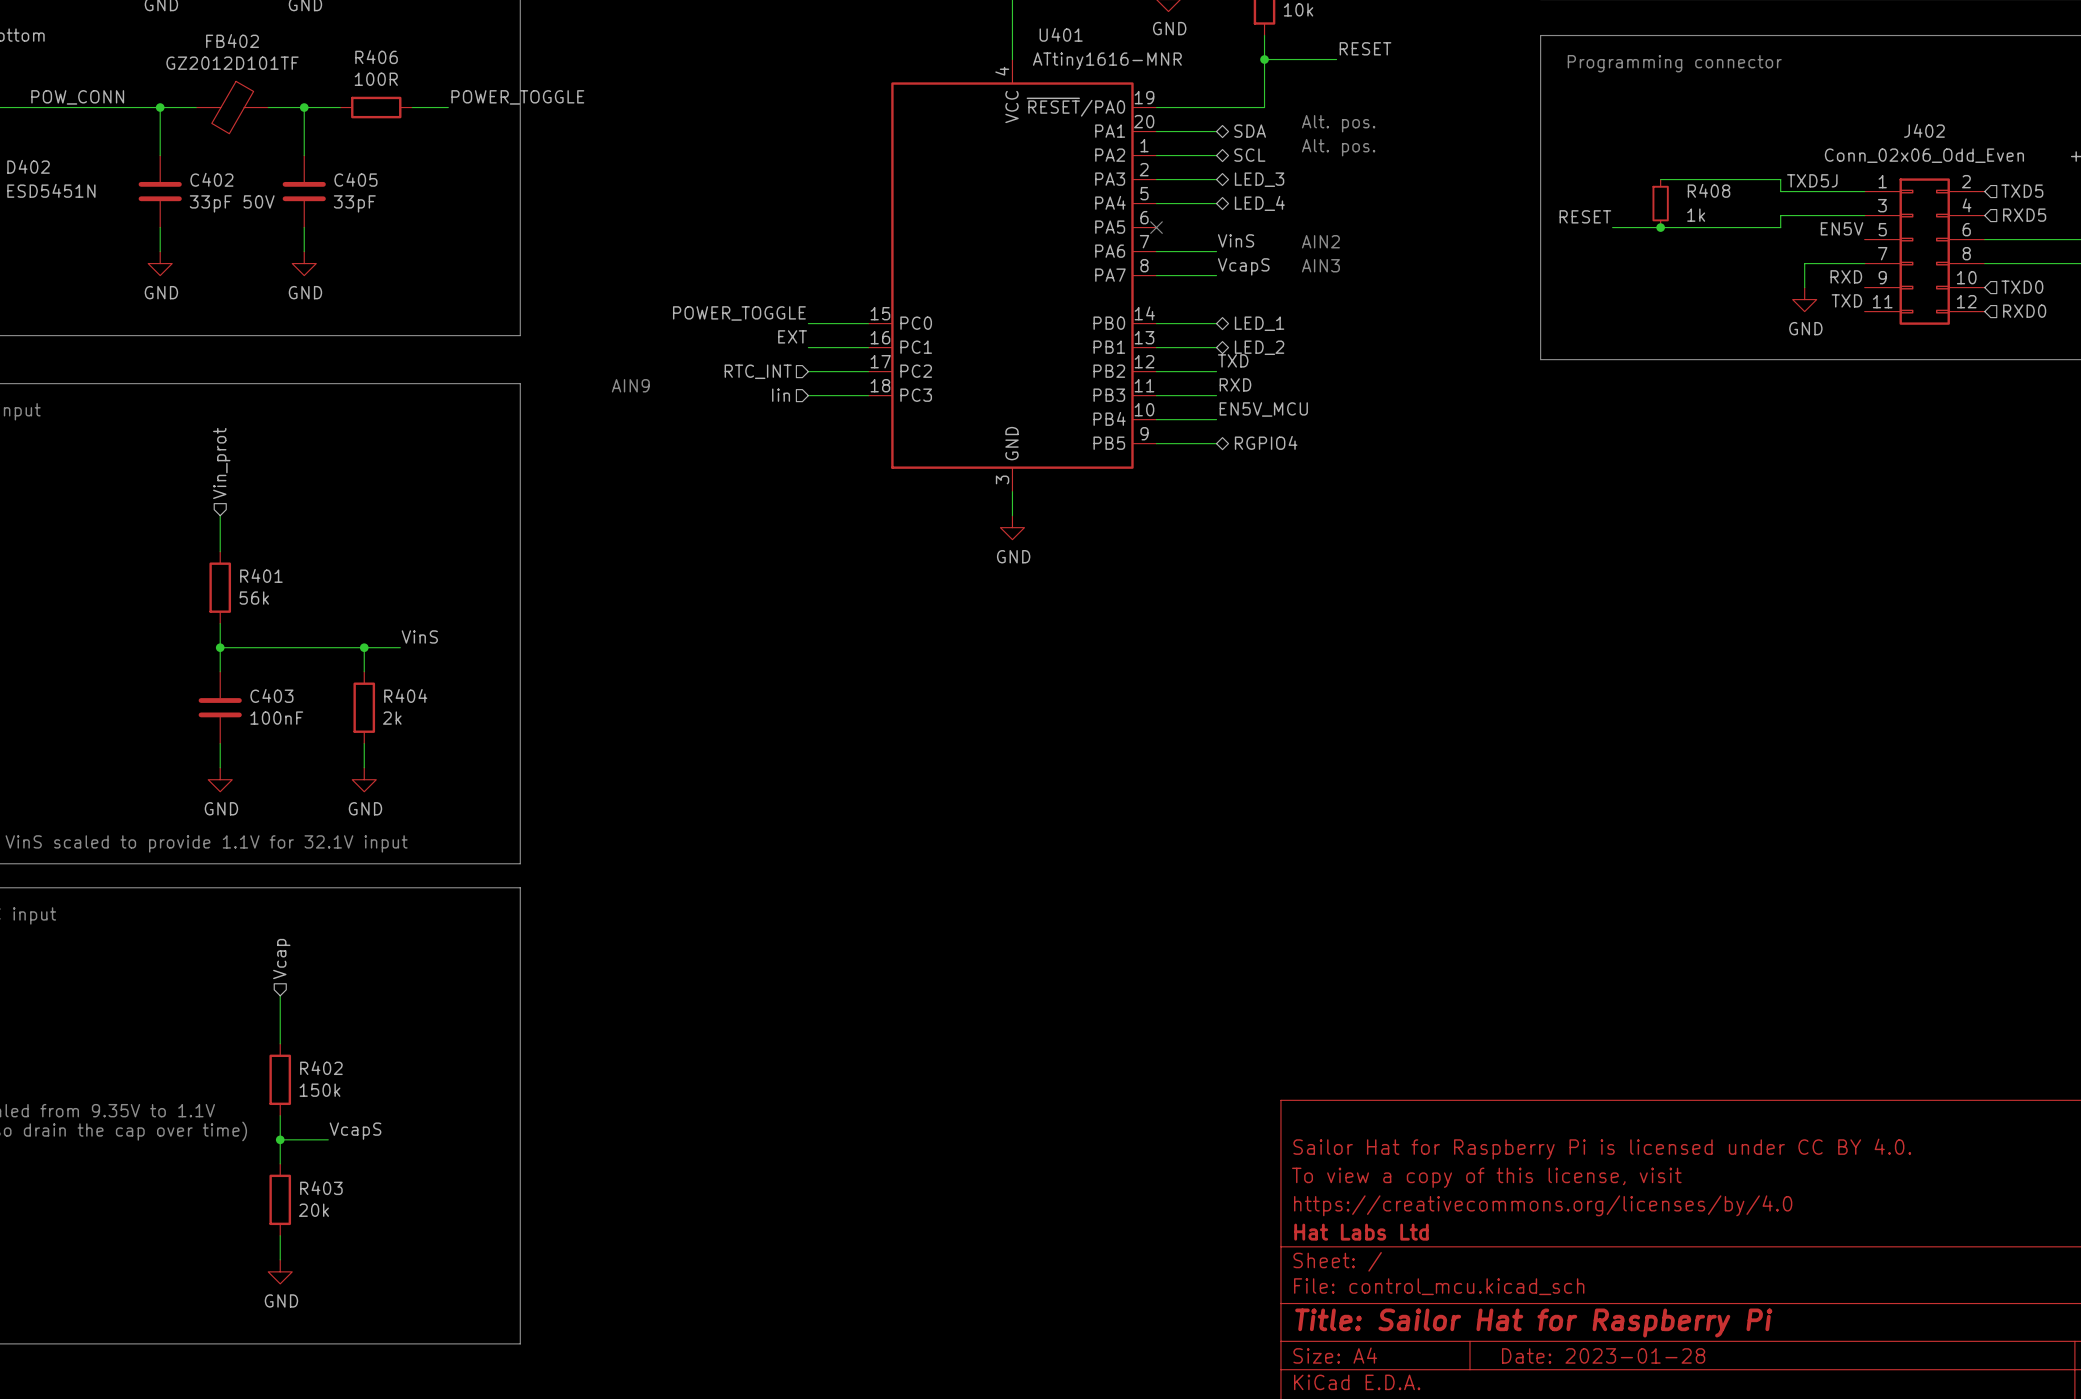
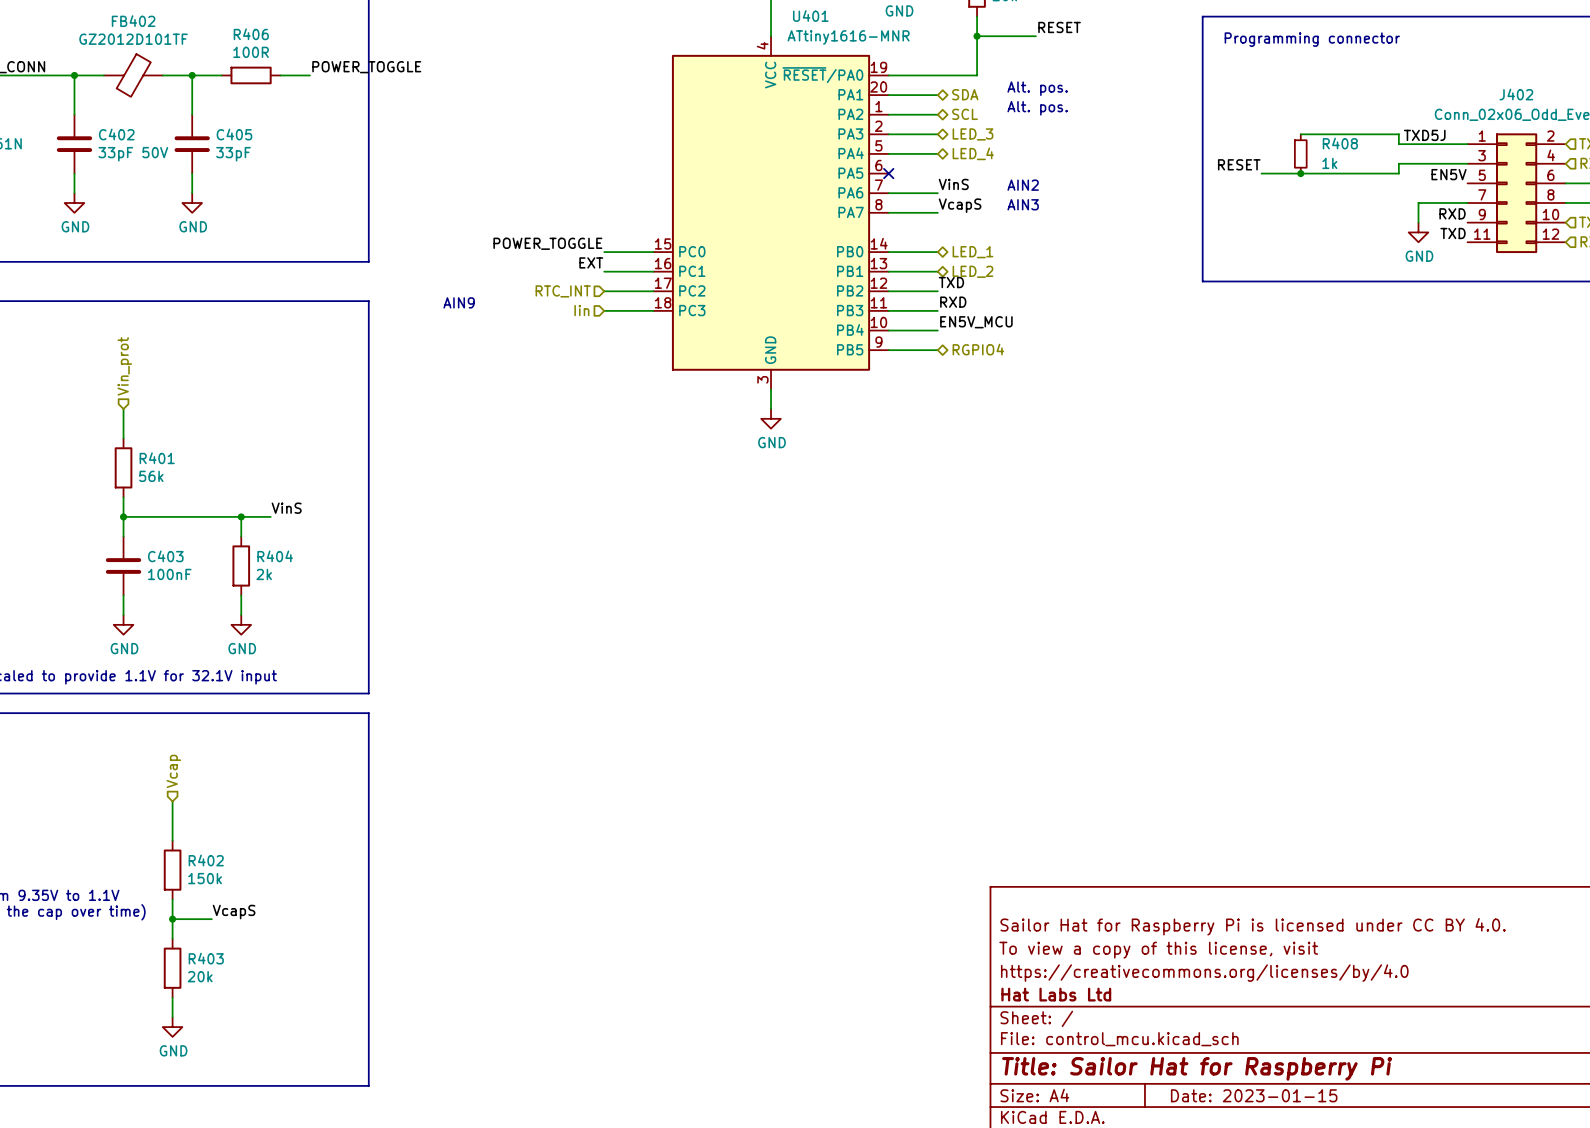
title block: Date: 2023-01-28 (1603, 1355) -> Date: 2023-01-15 (1254, 1095)

